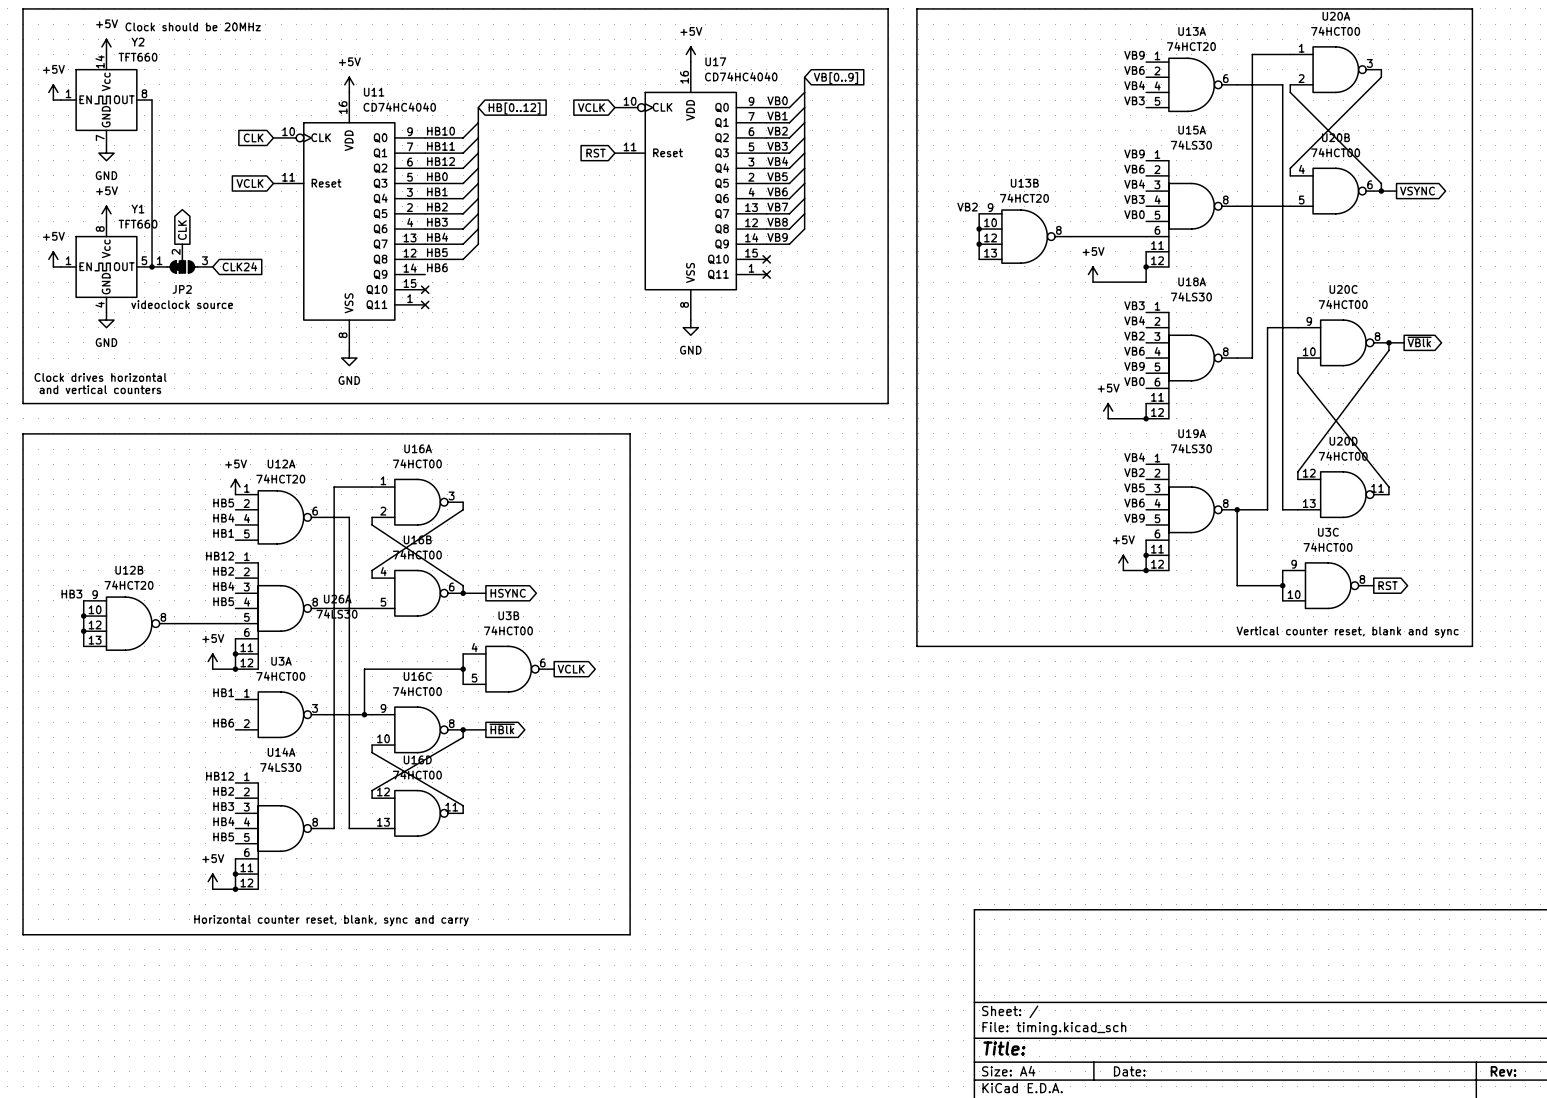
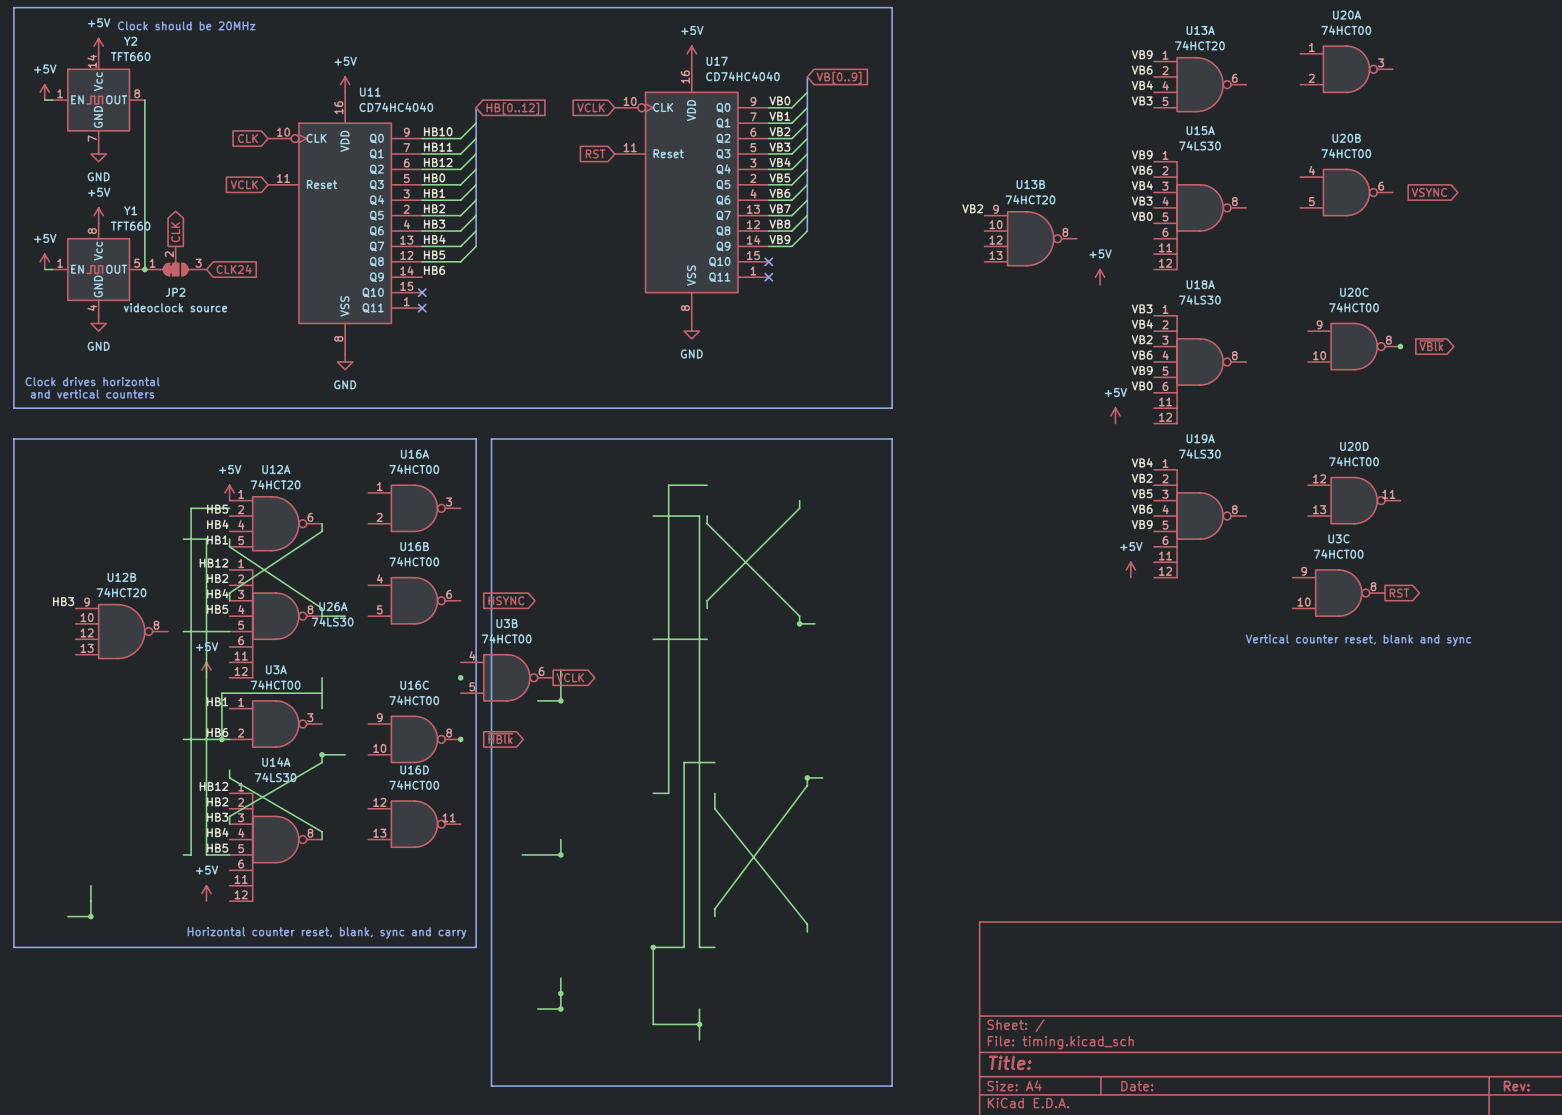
line: (916, 8) (1472, 8) (1472, 646) (916, 646) (916, 8) -> none
wire: (1290, 54) (1252, 54) (1252, 358) (1237, 358) -> none
wire: (1381, 69) (1381, 77) (1290, 168) (1290, 175) -> none
wire: (1237, 84) (1282, 84) (1282, 509) (1297, 509) -> none
wire: (1290, 84) (1290, 92) (1381, 183) (1381, 191) (1396, 191) -> none
junction: (1381, 191) -> none
wire: (1237, 206) (1290, 206) -> none
wire: (979, 213) (979, 259) -> none
junction: (979, 229) -> none
wire: (1070, 236) (1146, 236) -> none
junction: (979, 244) -> none
wire: (1146, 251) (1146, 282) (1093, 282) -> none
junction: (1146, 266) -> none
wire: (1297, 327) (1267, 327) (1267, 509) (1237, 509) (1237, 585) (1282, 585) -> none
wire: (1404, 342) (1388, 342) (1388, 350) (1297, 471) (1297, 479) -> none
wire: (1297, 358) (1297, 373) (1388, 487) (1388, 494) -> none
wire: (1146, 403) (1146, 418) (1108, 418) -> none
junction: (1146, 418) -> none
line: (478, 433) (493, 433) -> (630, 439) (892, 439) (892, 1086) (491, 1086) (491, 439)
line: (630, 433) (630, 934) (478, 934) -> (476, 439) (476, 947)
wire: none -> (707, 485) (668, 485) (668, 793) (653, 793)
wire: (372, 487) (334, 487) (334, 828) (326, 828) -> (229, 770) (229, 777) (322, 831) (322, 839)
wire: none -> (799, 500) (799, 508) (707, 600) (707, 608)
wire: none -> (229, 508) (191, 508) (191, 854) (183, 854)
wire: (463, 502) (463, 509) (372, 570) (372, 578) -> none
wire: none -> (653, 516) (699, 516) (699, 947) (714, 947)
wire: none -> (707, 516) (707, 523) (799, 616) (799, 623) (815, 623)
junction: (1237, 509) -> none
wire: (326, 517) (349, 517) (349, 828) (372, 828) -> (322, 523) (322, 531) (229, 593) (229, 600)
wire: (372, 517) (372, 524) (463, 585) (463, 593) (485, 593) -> none
wire: none -> (183, 539) (206, 539) (206, 854) (229, 854)
wire: none -> (229, 539) (229, 546) (322, 608) (322, 616)
wire: (1146, 540) (1146, 570) (1123, 570) -> none
junction: (1146, 555) -> none
junction: (1146, 570) -> none
wire: (1282, 570) (1282, 600) -> none
junction: (1282, 585) -> none
junction: (463, 593) -> none
wire: (83, 600) (83, 646) -> none
wire: (349, 608) (372, 608) -> none
junction: (83, 616) -> none
junction: none -> (799, 623)
wire: (174, 623) (189, 623) -> none
junction: (83, 631) -> none
wire: none -> (653, 639) (707, 639)
wire: (235, 638) (235, 669) (212, 669) -> none
junction: (235, 653) -> none
wire: (463, 653) (463, 684) -> (322, 677) (322, 708)
wire: none -> (560, 670) (560, 700) (537, 700)
junction: (235, 669) -> none
wire: (463, 669) (364, 669) (364, 714) -> (322, 693) (221, 693) (221, 739)
junction: none -> (560, 700)
wire: (326, 714) (372, 714) -> (183, 739) (229, 739)
junction: (364, 714) -> none
junction: none -> (221, 739)
wire: (485, 729) (463, 729) (463, 737) (372, 790) (372, 798) -> (345, 754) (322, 754) (322, 762) (229, 816) (229, 824)
junction: none -> (322, 754)
wire: (372, 745) (372, 752) (463, 805) (463, 813) -> none
wire: none -> (714, 762) (684, 762) (684, 947) (653, 947) (653, 1024) (699, 1024)
junction: none -> (807, 777)
wire: none -> (822, 777) (807, 777) (807, 785) (714, 908) (714, 916)
wire: none -> (714, 793) (714, 808) (807, 924) (807, 931)
wire: none -> (560, 839) (560, 854) (522, 854)
junction: none -> (560, 854)
wire: (235, 858) (235, 889) (212, 889) -> (90, 885) (90, 916) (67, 916)
junction: (235, 874) -> none
junction: (235, 889) -> none
junction: none -> (90, 916)
junction: none -> (653, 947)
wire: none -> (560, 978) (560, 1009) (537, 1009)
junction: none -> (560, 993)
junction: none -> (560, 1009)
wire: none -> (699, 1009) (699, 1039)
junction: none -> (699, 1024)

